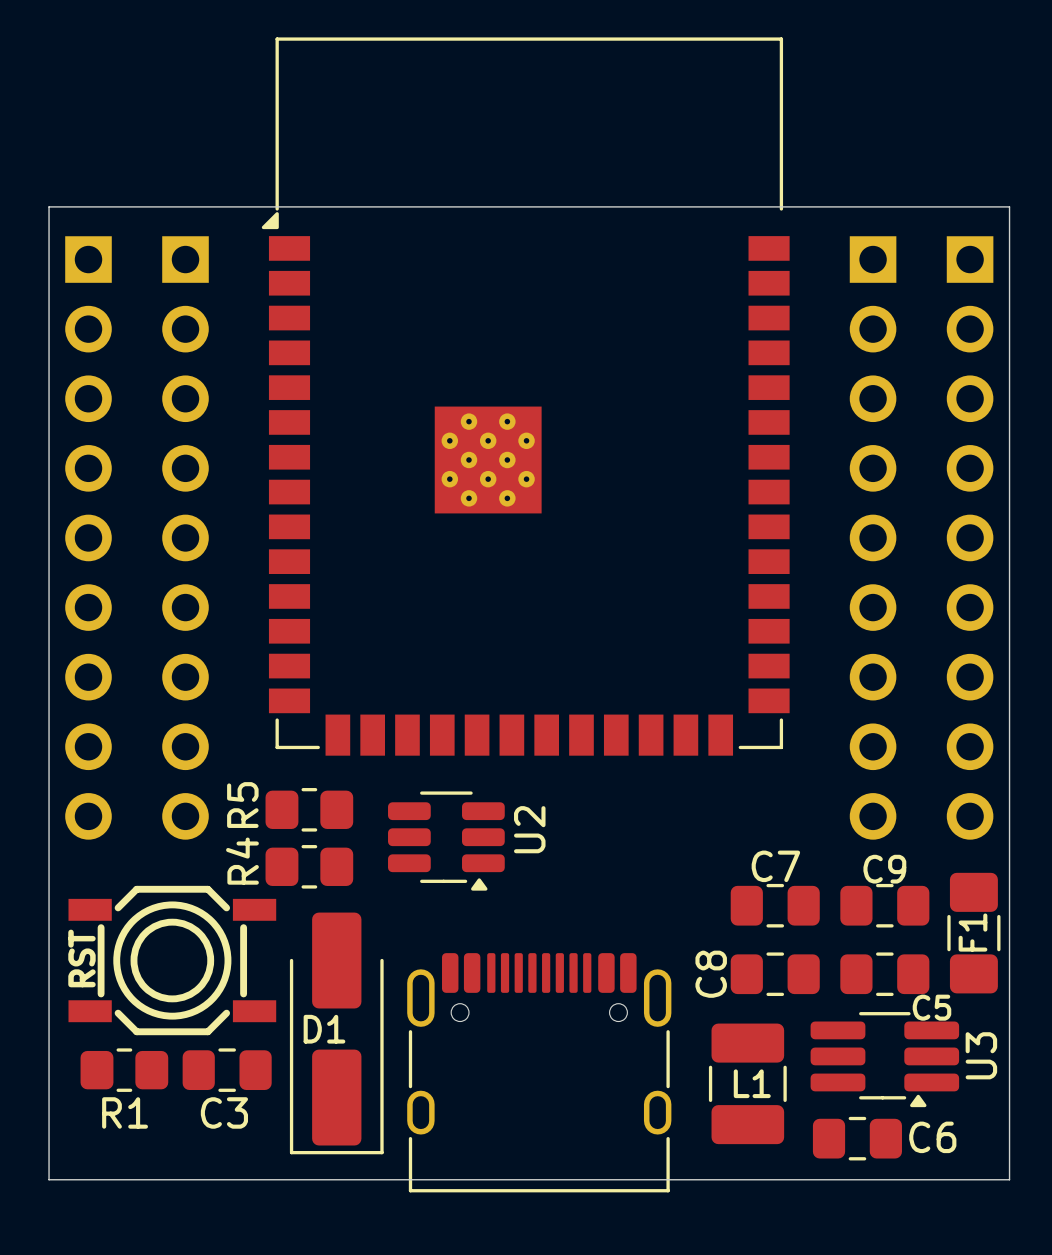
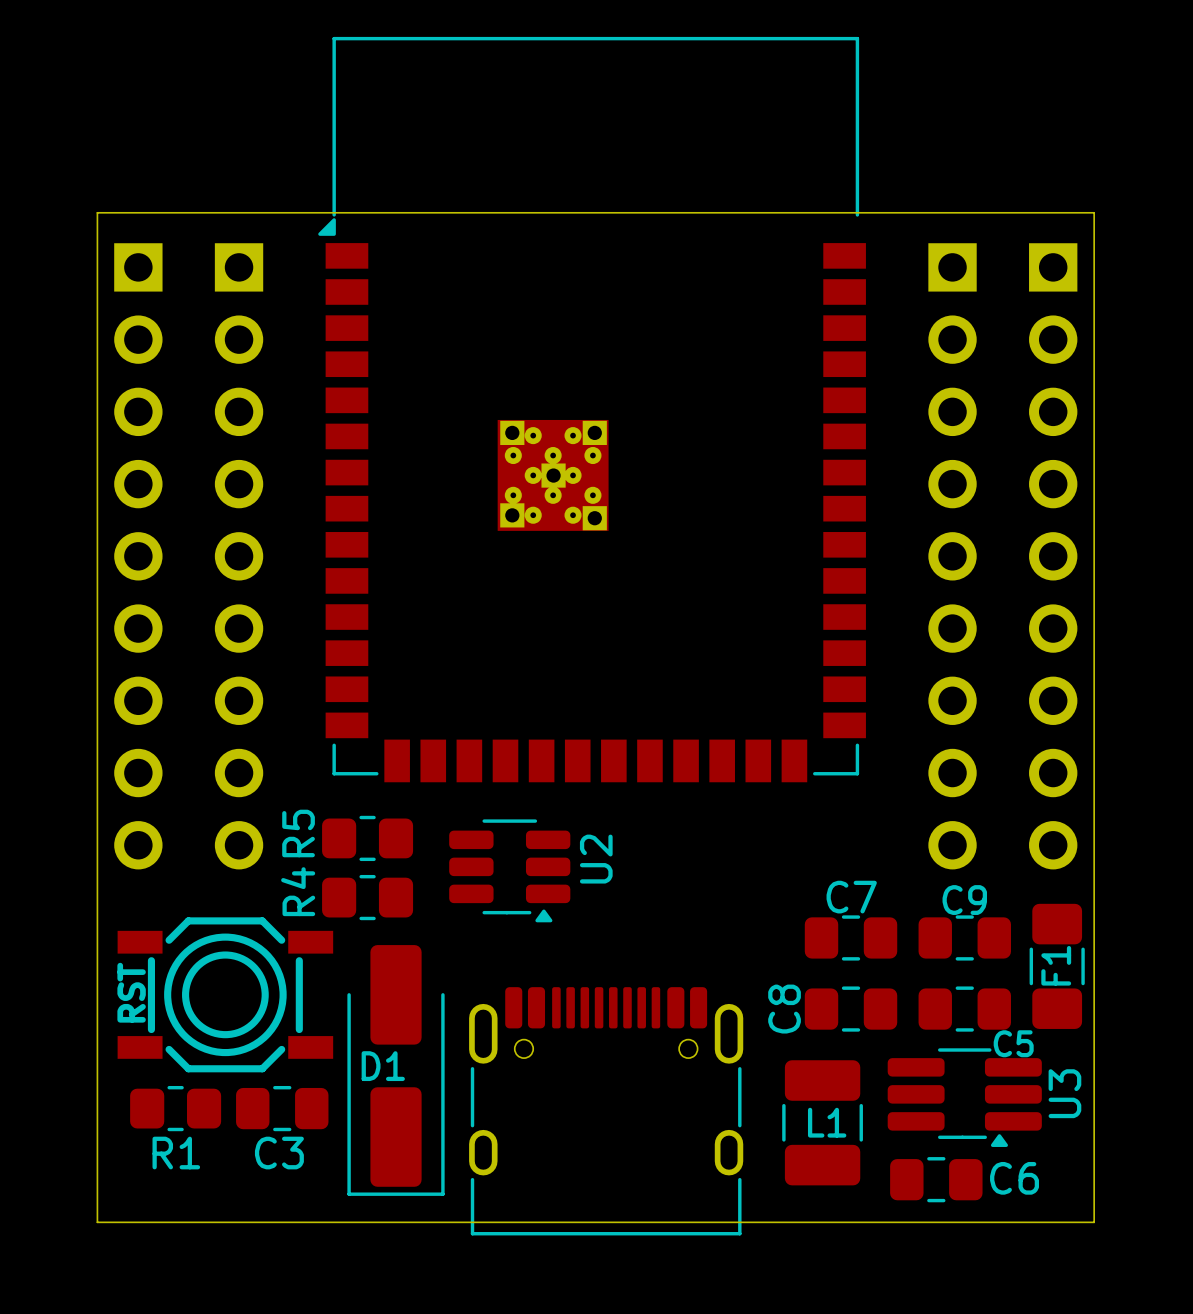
part: none -> (512, 432)
part: none -> (594, 432)
part: none -> (553, 475)
part: none -> (512, 515)
part: none -> (594, 518)

